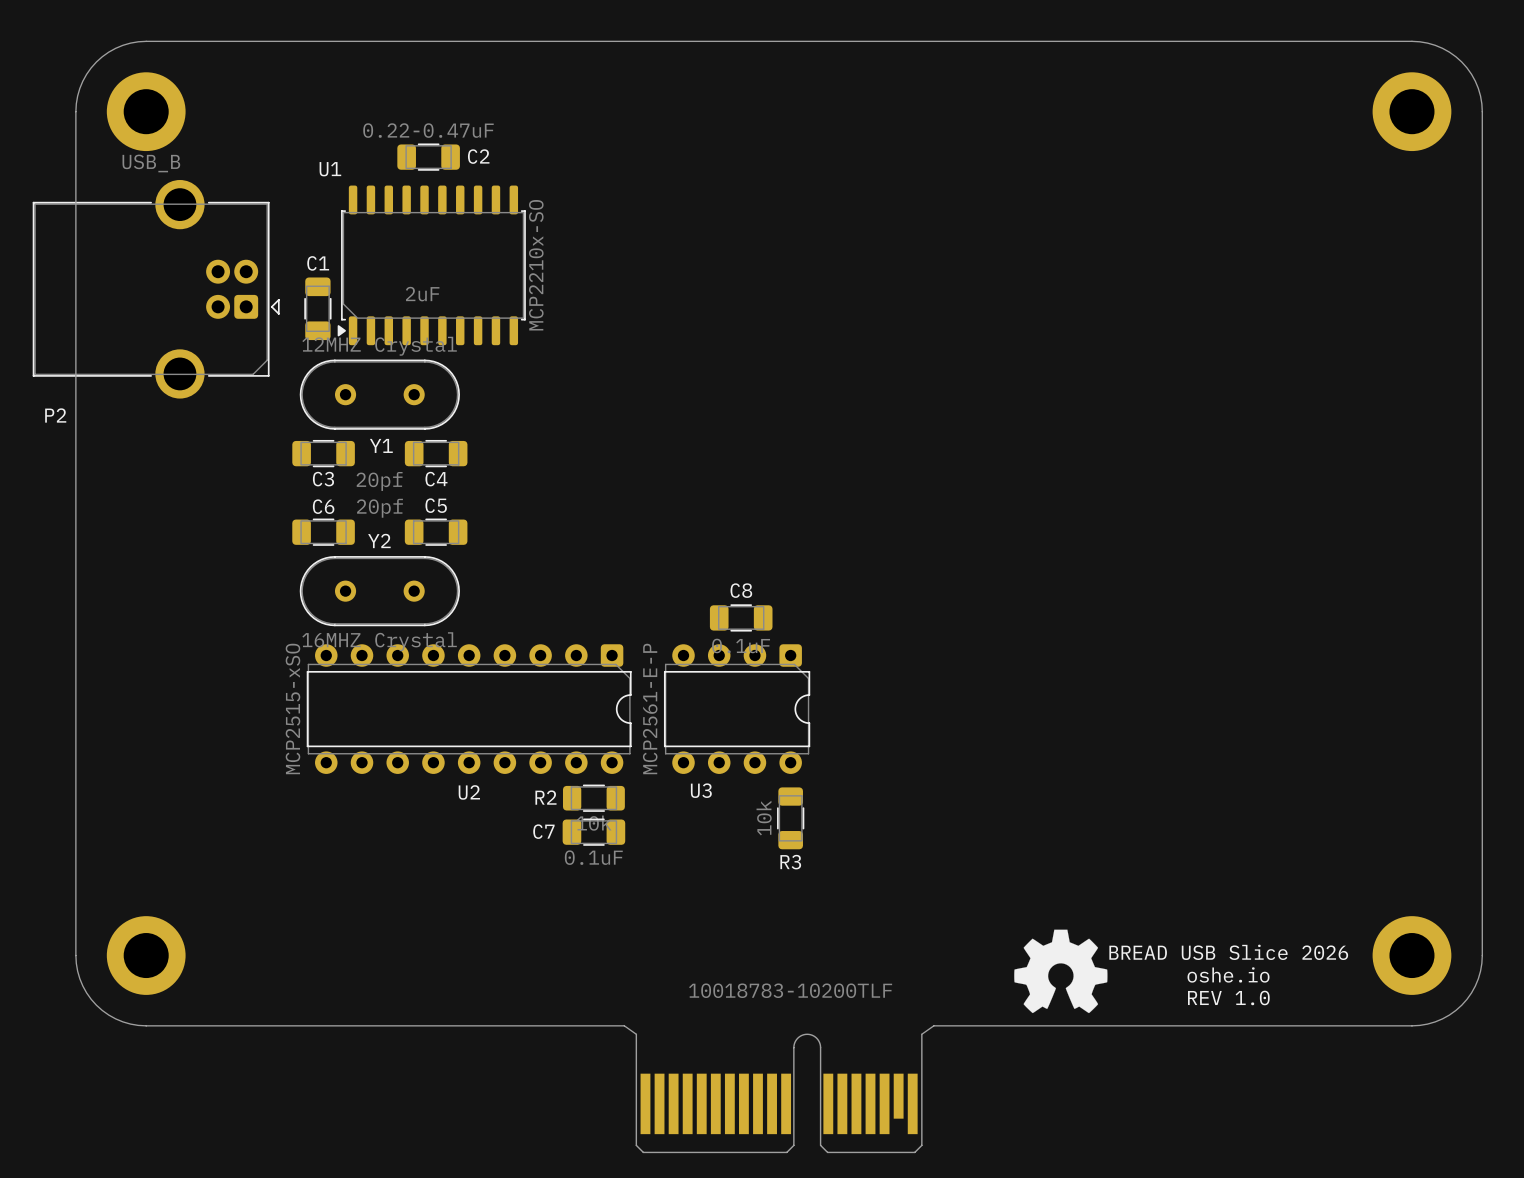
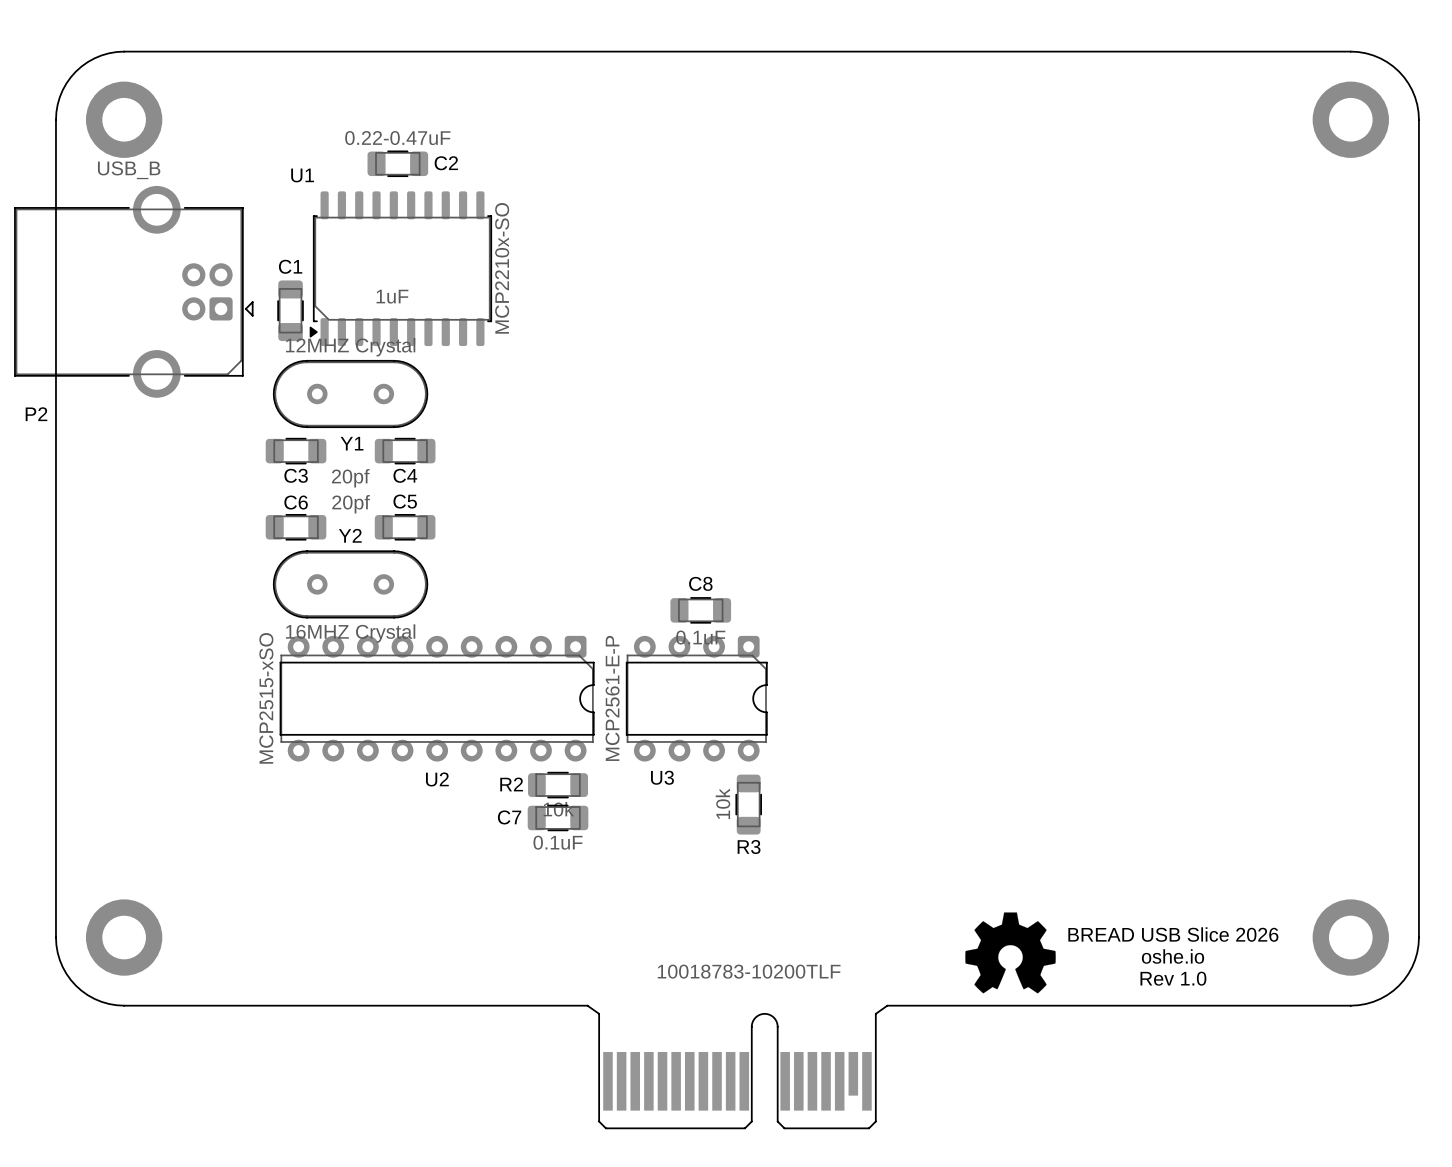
C1 value: 2uF (422, 294) -> 1uF (392, 296)
text: REV 1.0 (1228, 997) -> Rev 1.0 (1173, 978)

